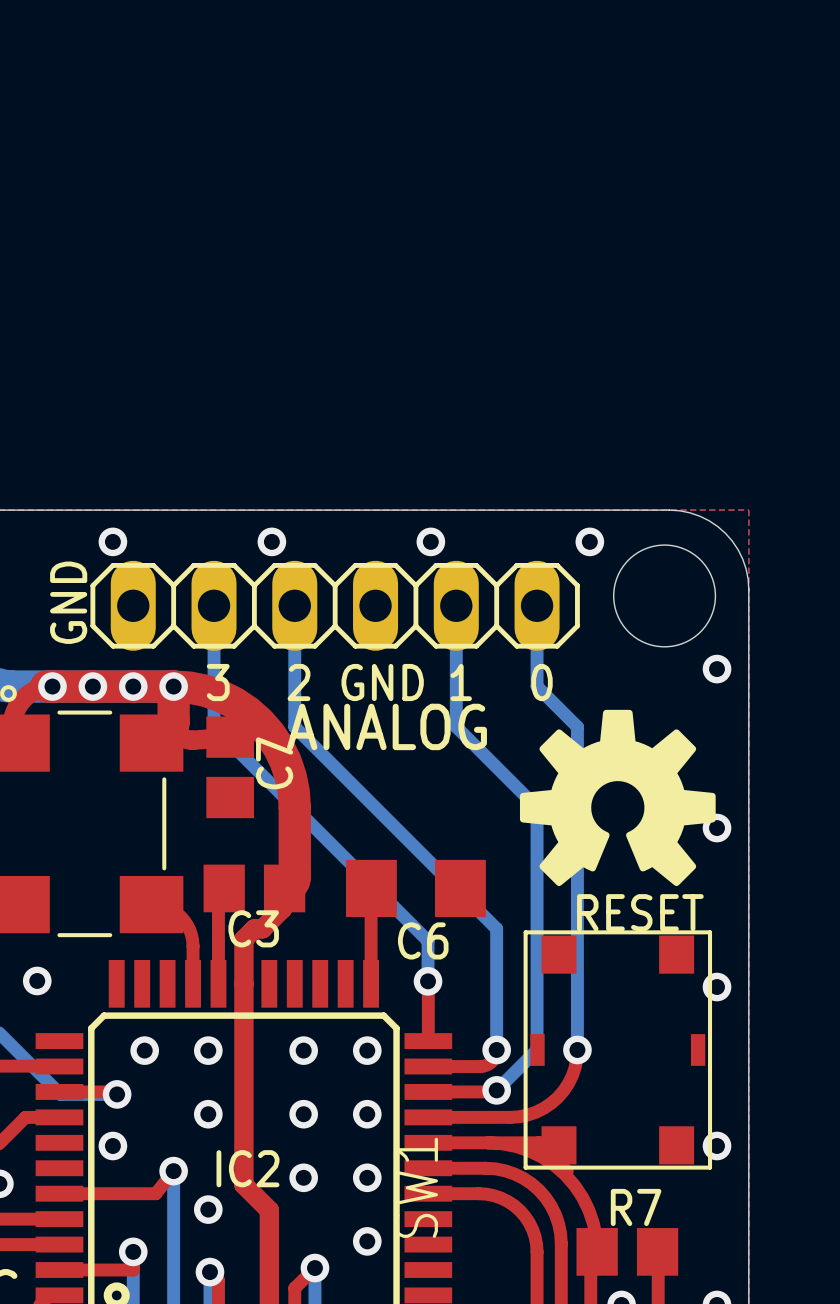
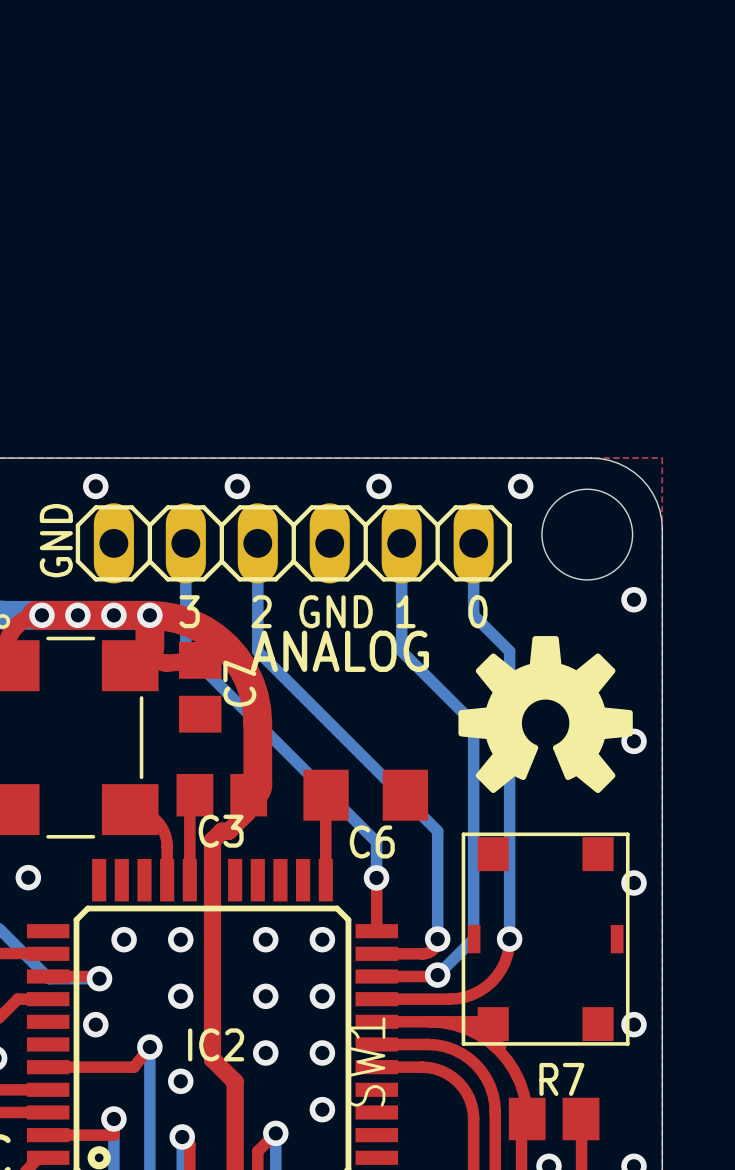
text: RESET (640, 912) -> none

